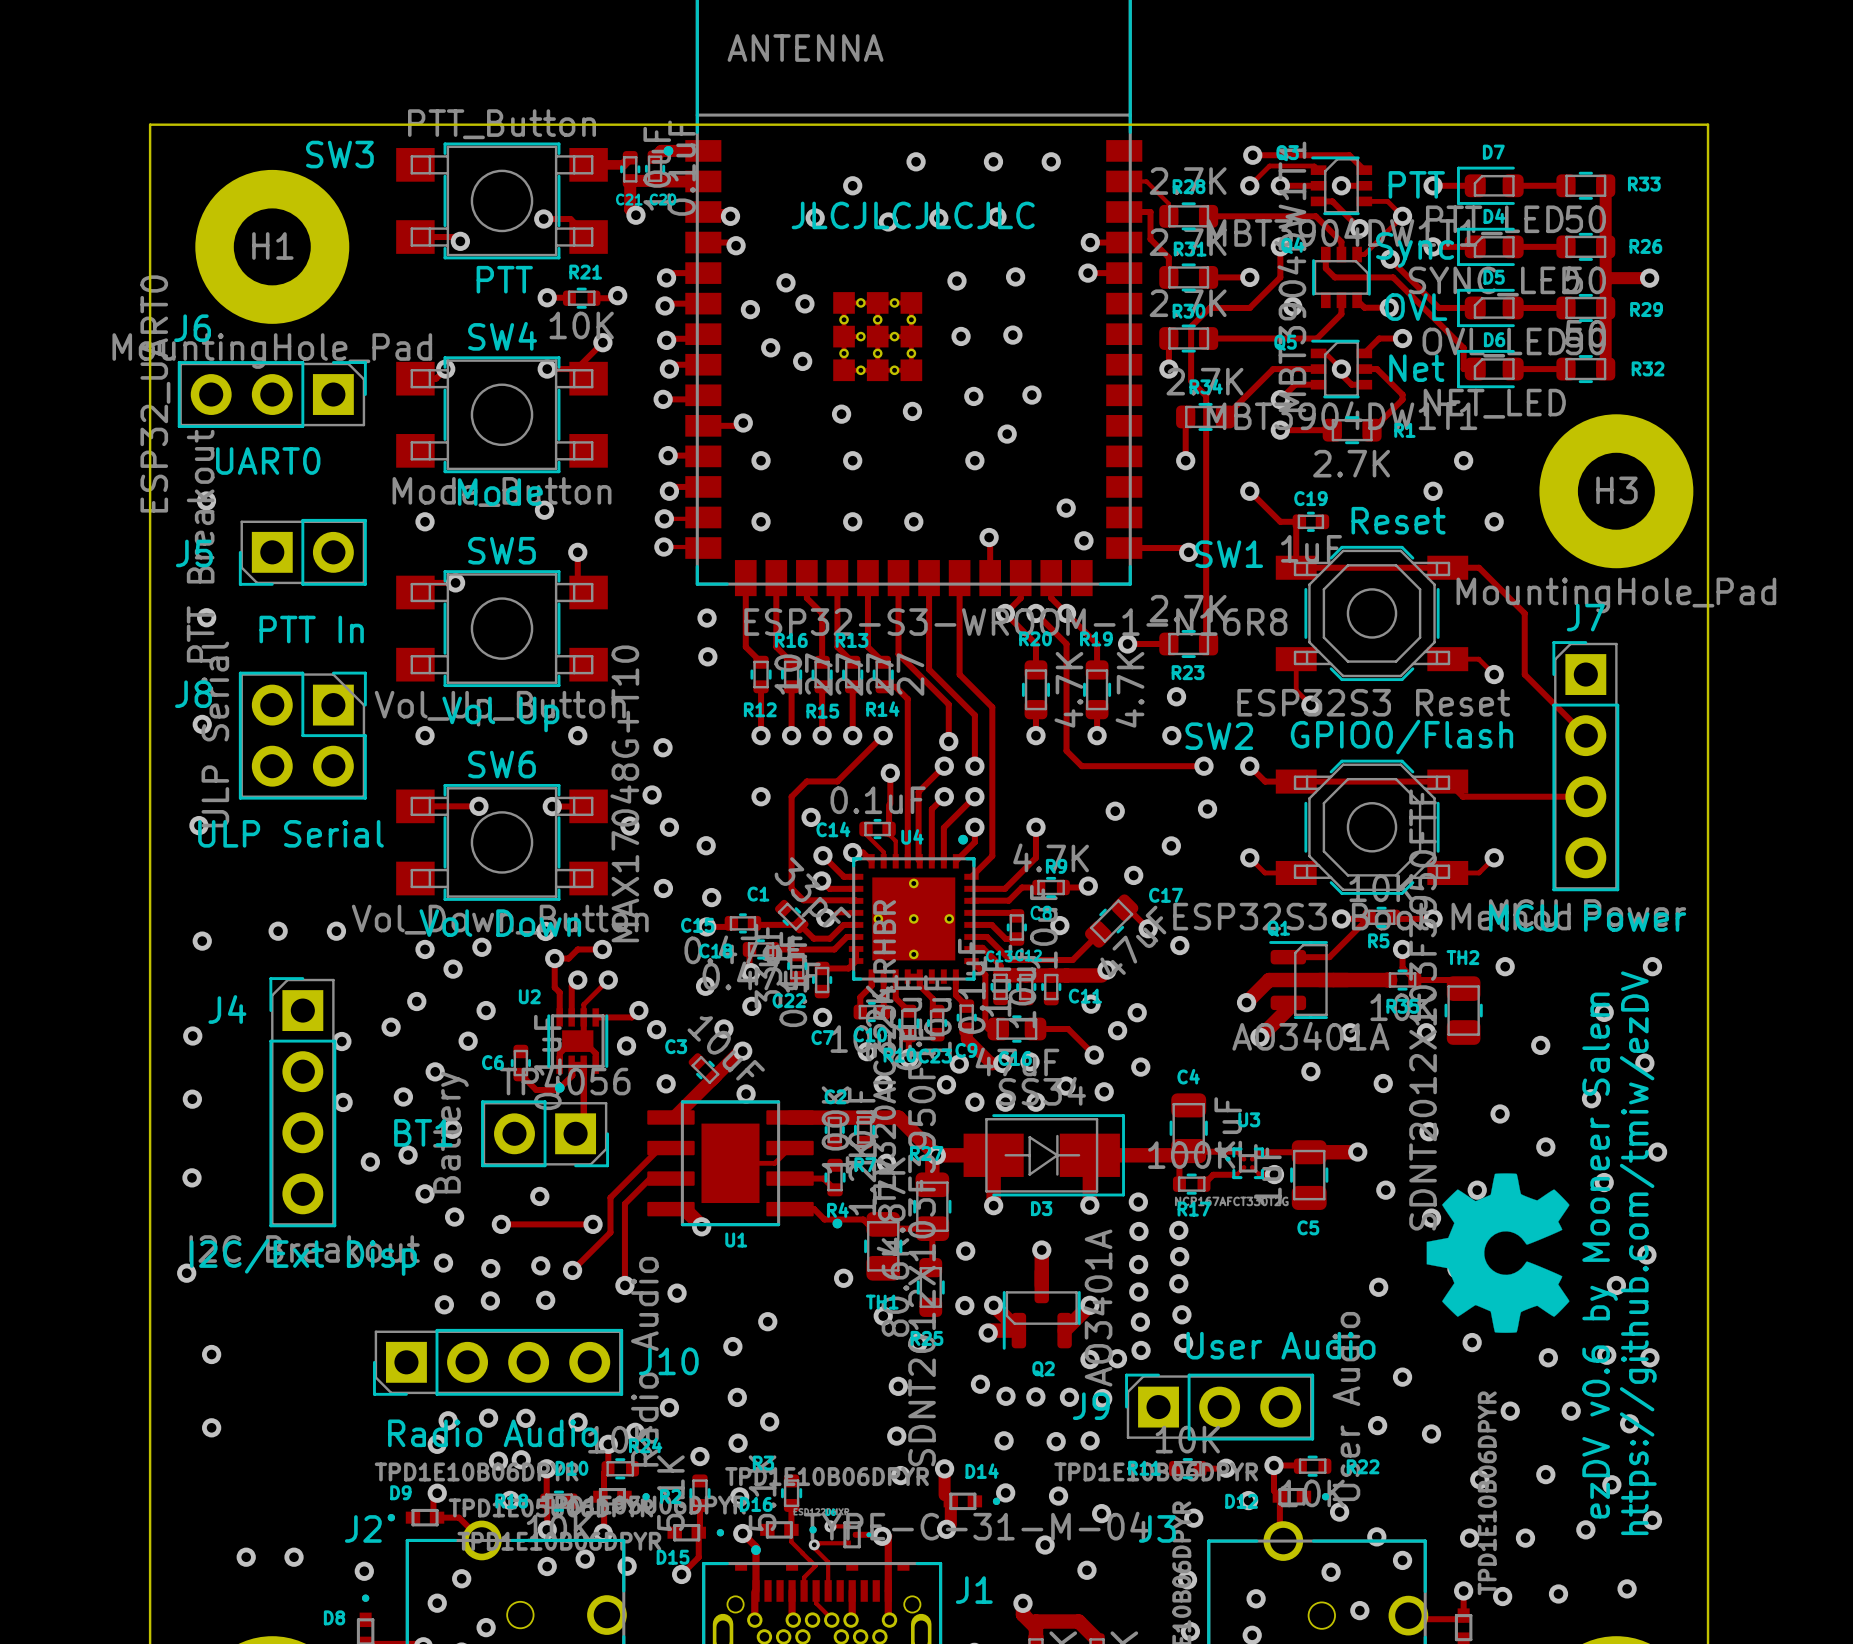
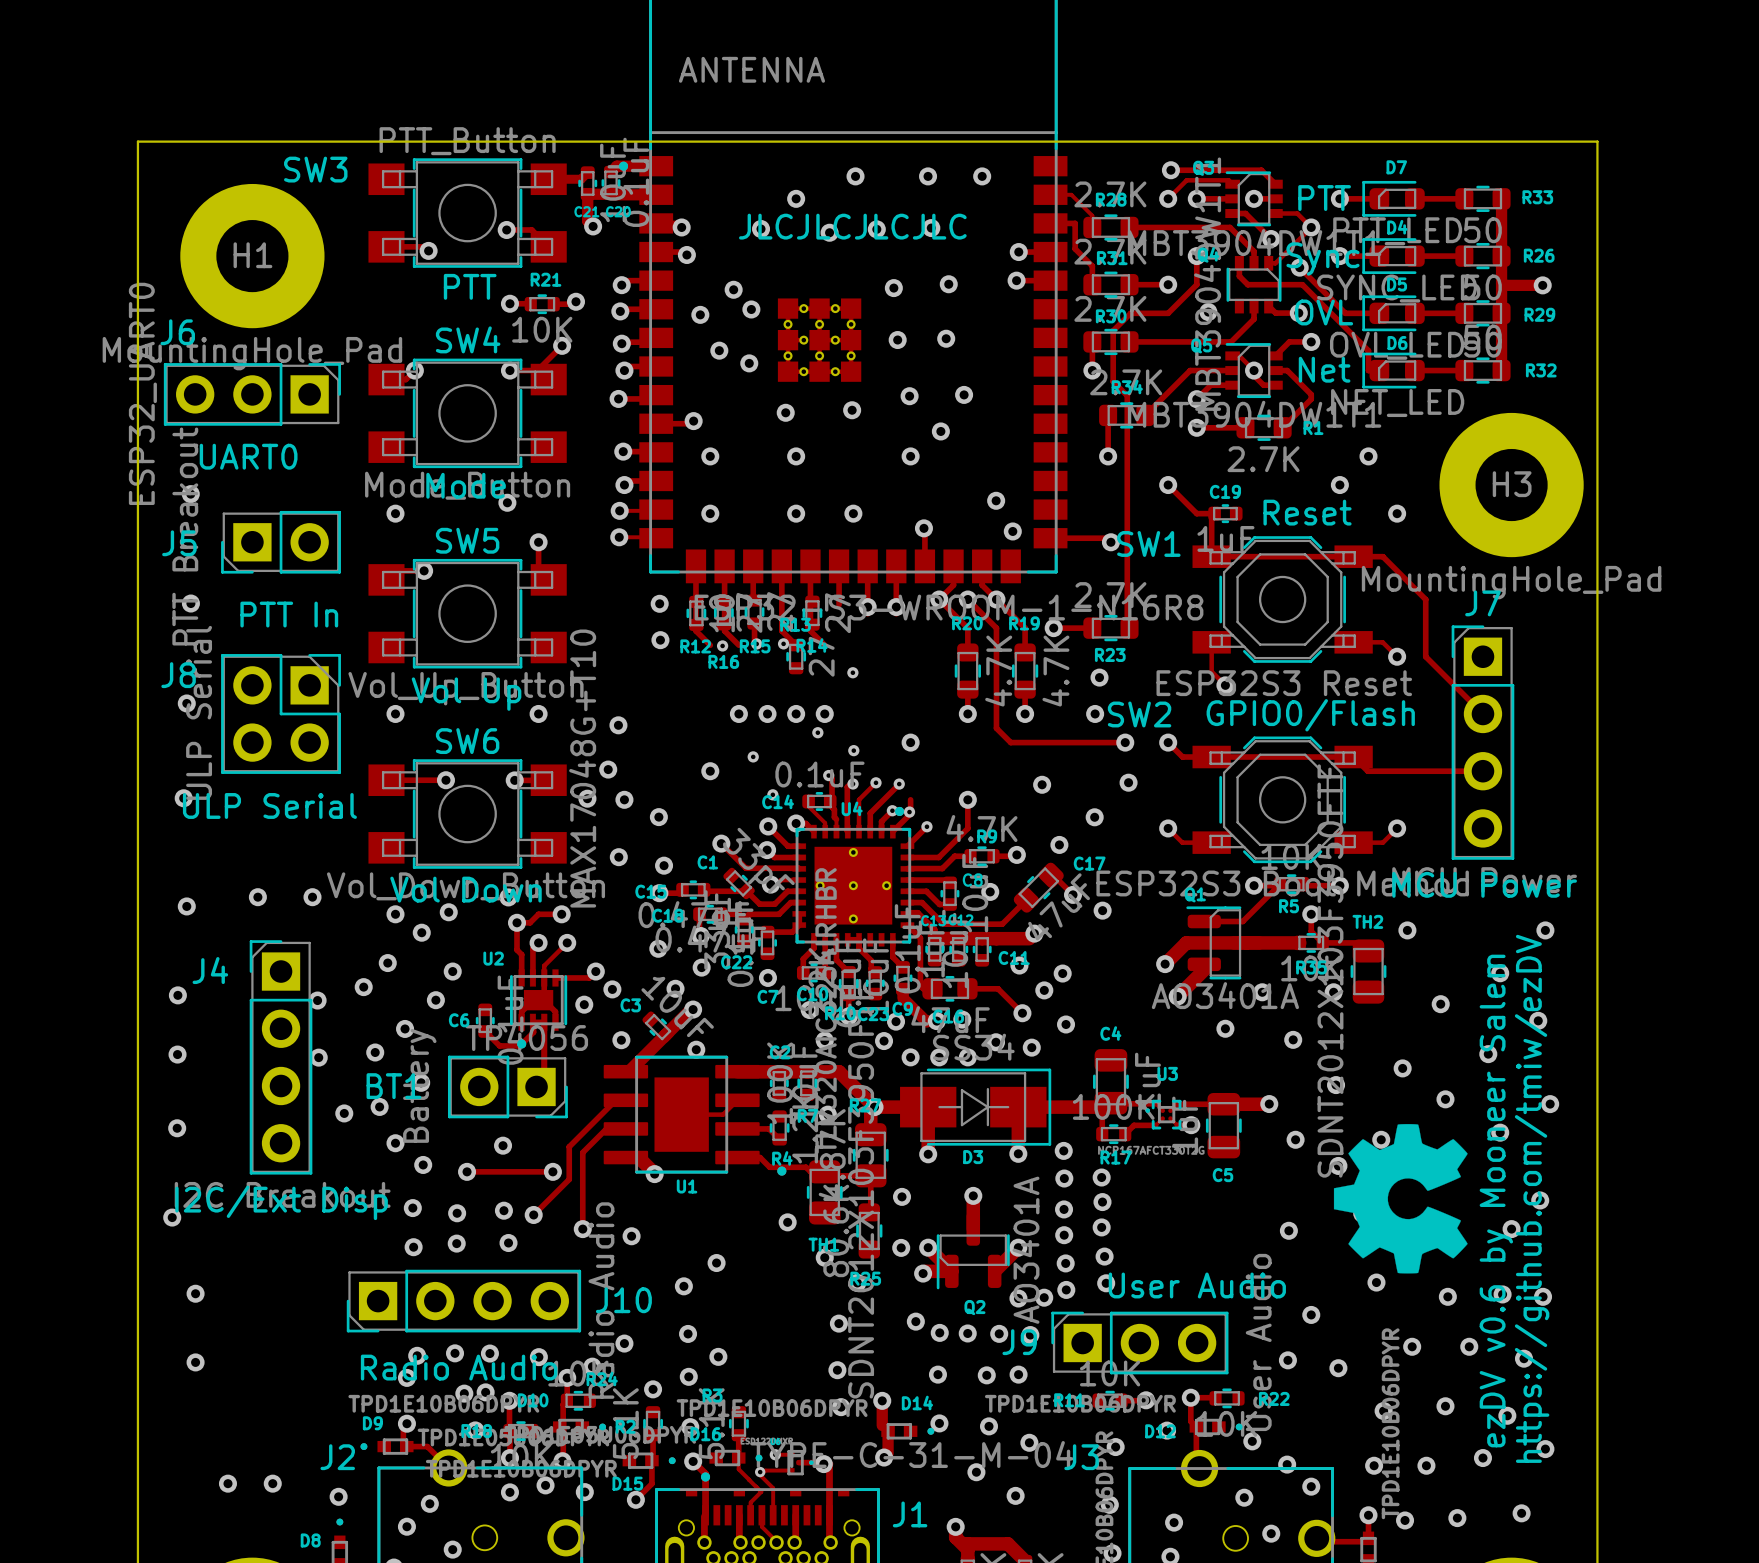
top track: (806, 598) (822, 613) (822, 662) -> (753, 585) (754, 600)
top track: (898, 619) (898, 654) (948, 704) (948, 741) -> none
via: none -> (867, 607)
via: none -> (896, 607)
top track: (929, 628) (929, 669) (974, 715) (974, 766) -> none
top track: (959, 628) (959, 674) (992, 707) (992, 856) -> none
top track: none -> (754, 623) (754, 641) (756, 643)
R16 name position: R16 (791, 640) -> R16 (723, 661)
via: none -> (756, 643)
via: none -> (783, 643)
via: none -> (722, 645)
R12 position: (761, 674) -> (696, 613)
R16 position: (791, 674) -> (723, 612)
R15 position: (822, 674) -> (754, 612)
R14 position: (883, 674) -> (812, 613)
top track: (761, 686) (761, 735) -> none
top track: (791, 686) (791, 735) -> none
top track: (822, 686) (822, 735) -> none
top track: (852, 686) (852, 735) -> none
top track: (883, 686) (895, 686) (907, 699) (907, 861) -> (852, 781) (847, 787) (847, 831)
via: none -> (852, 672)
via: (761, 735) -> none
top track: (883, 735) (837, 781) (806, 781) (791, 796) (791, 888) (803, 900) -> (721, 843) (745, 868) (750, 868)
via: (948, 741) -> none
via: none -> (817, 732)
top track: (944, 766) (918, 791) (919, 861) -> (875, 782) (859, 799) (859, 831)
via: (944, 766) -> none
top track: (890, 773) (889, 834) (895, 841) (895, 848) -> (828, 775) (832, 778) (832, 807) (836, 819)
via: (890, 773) -> none
via: none -> (853, 750)
via: none -> (753, 756)
via size: [934, 787, 954, 807] -> [870, 777, 882, 789]
top track: (944, 796) (931, 809) (931, 841) -> (898, 785) (870, 813)
top track: (974, 796) (943, 827) (943, 850) -> (892, 810) (881, 821)
via position: (974, 796) -> (899, 784)
via: none -> (828, 775)
via: none -> (853, 783)
via position: (811, 817) -> (721, 843)
via size: [965, 817, 985, 837] -> [903, 806, 916, 818]
via: none -> (772, 794)
via: none -> (892, 810)
via: none -> (926, 826)

